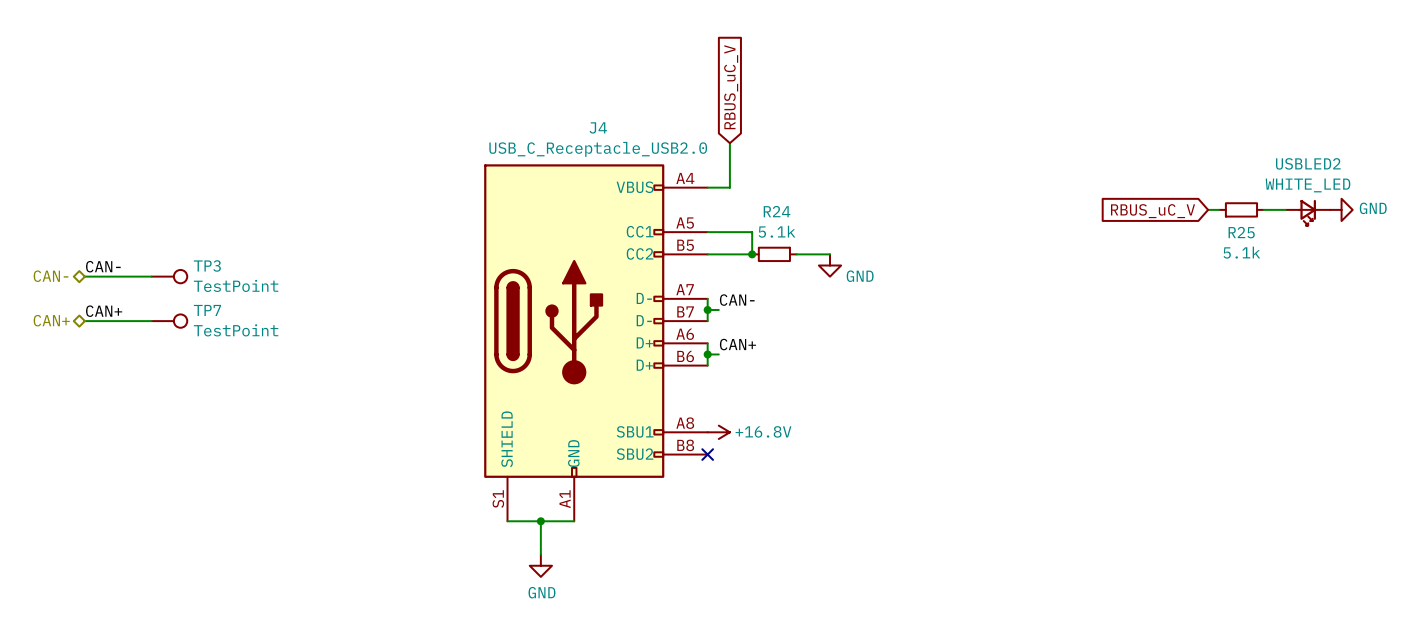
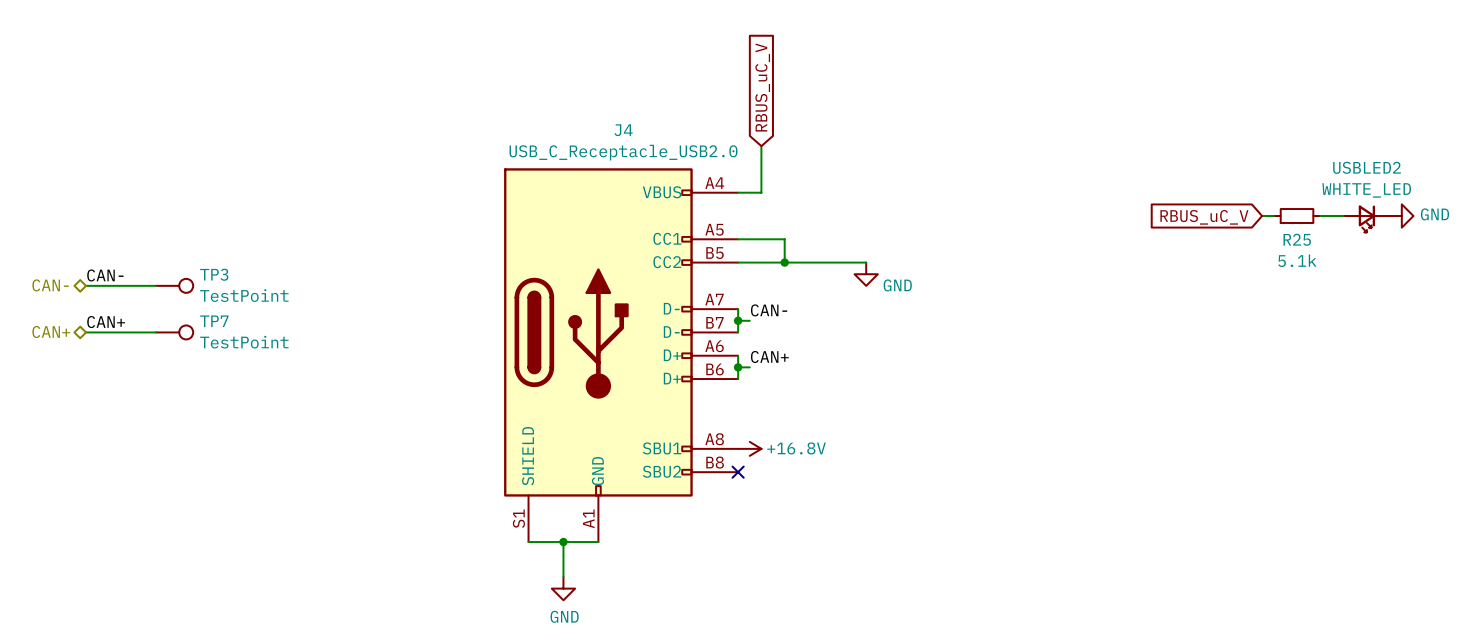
wire: none -> (784, 262) (831, 262)
R24: 5.1k (774, 254) -> none

